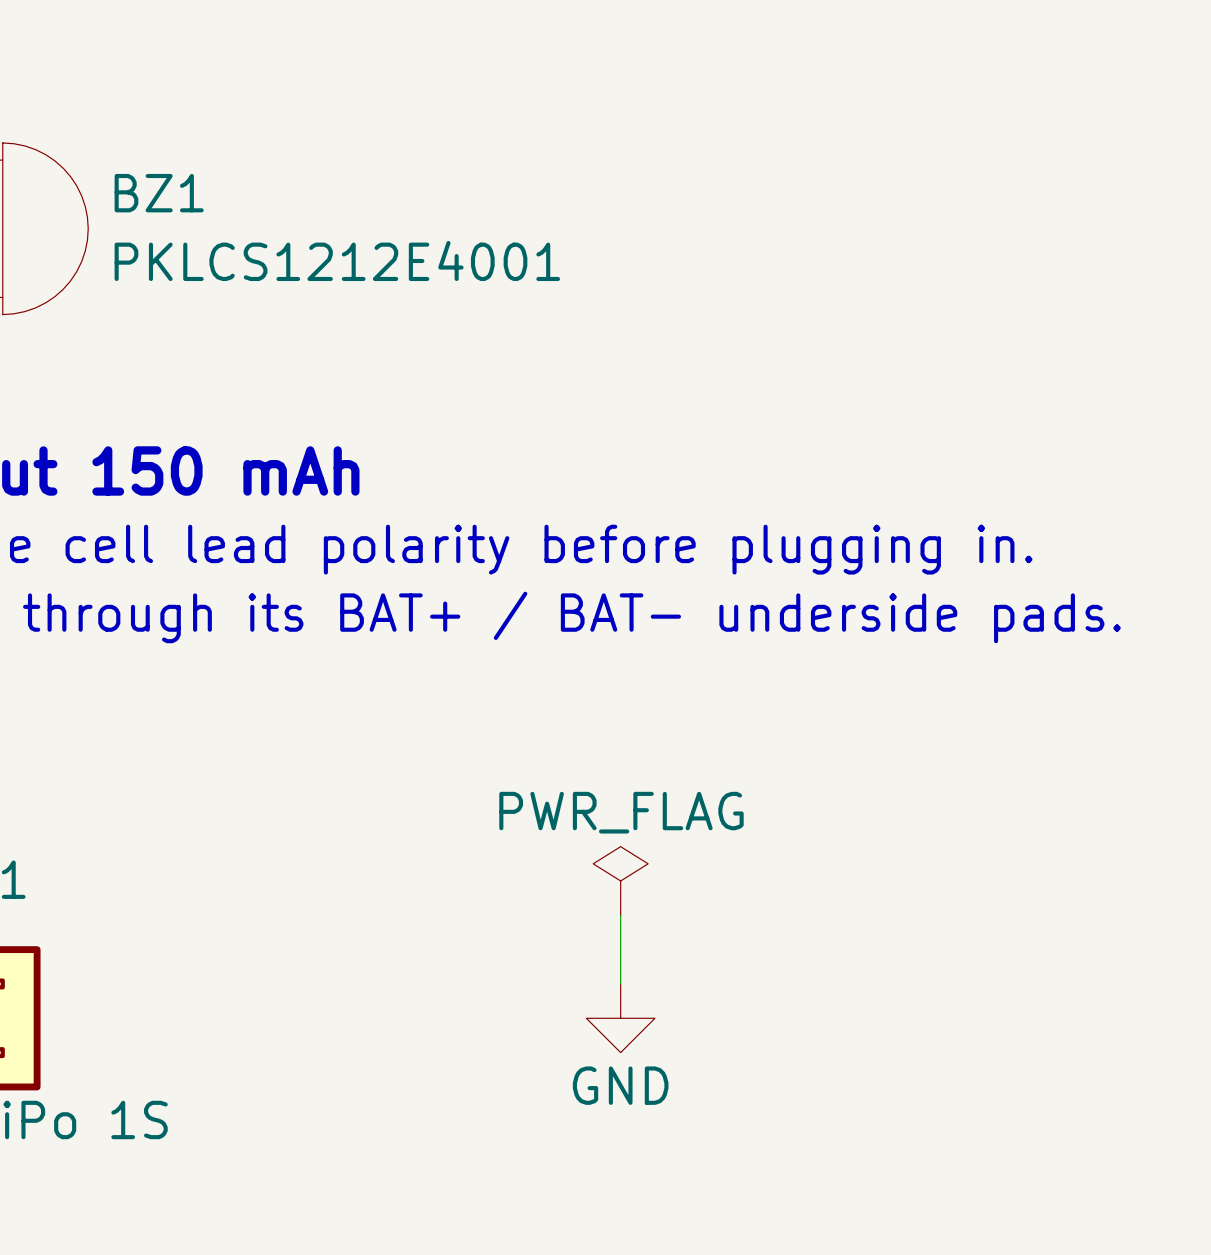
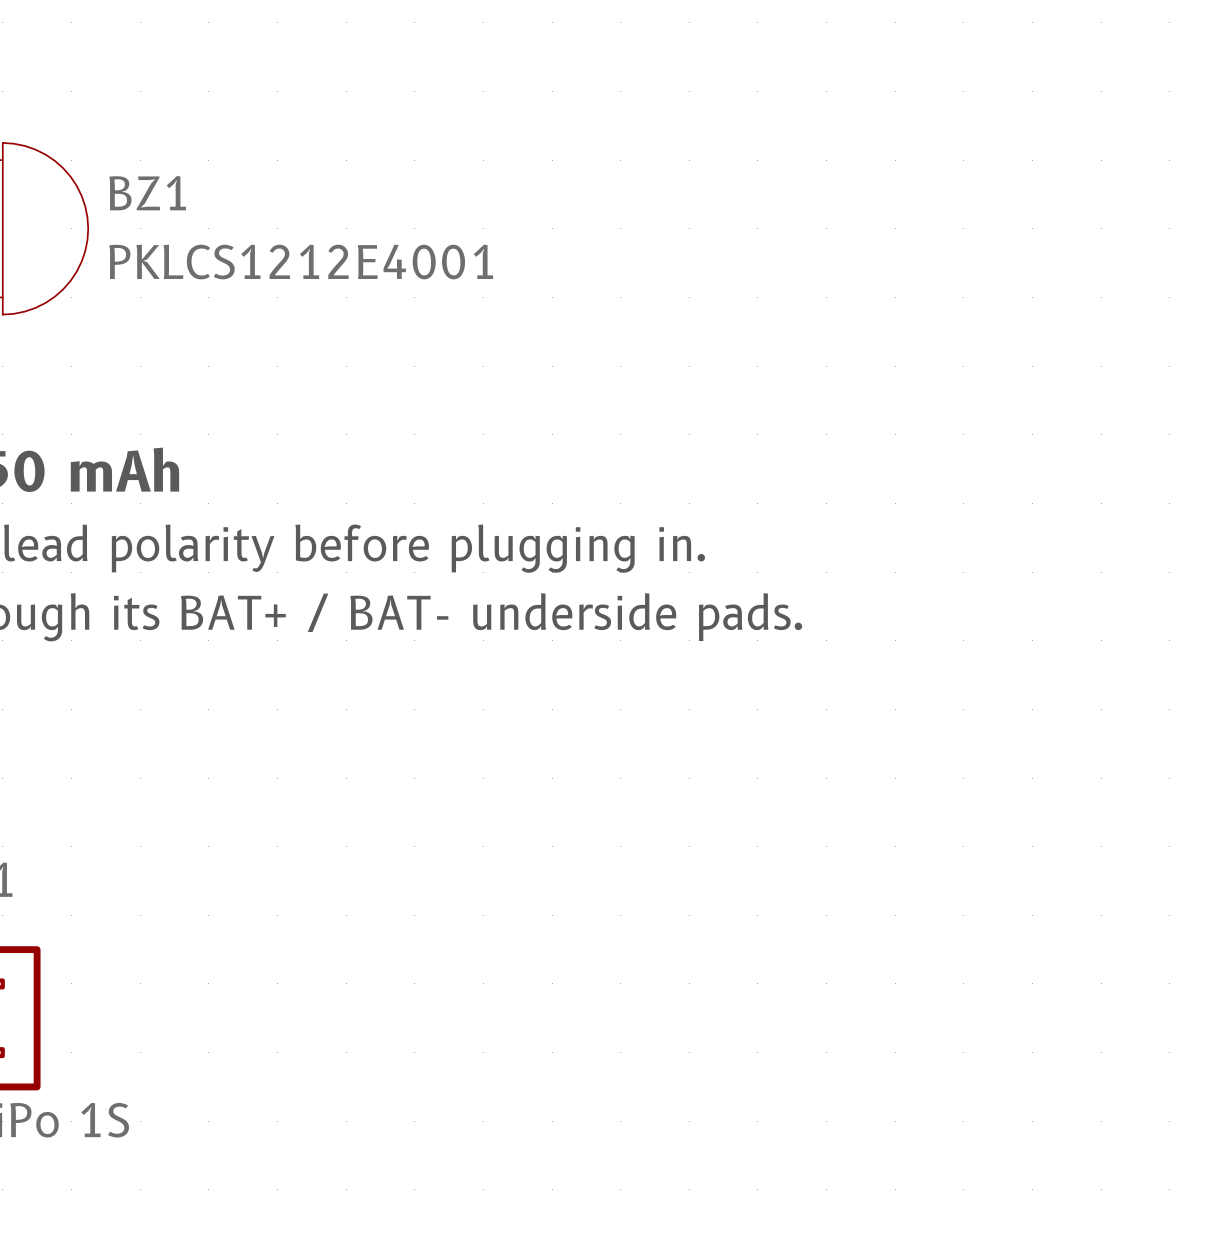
power symbol: PWR_FLAG (620, 880) -> none
wire: (620, 915) (620, 983) -> none
power symbol: GND (620, 1018) -> none

